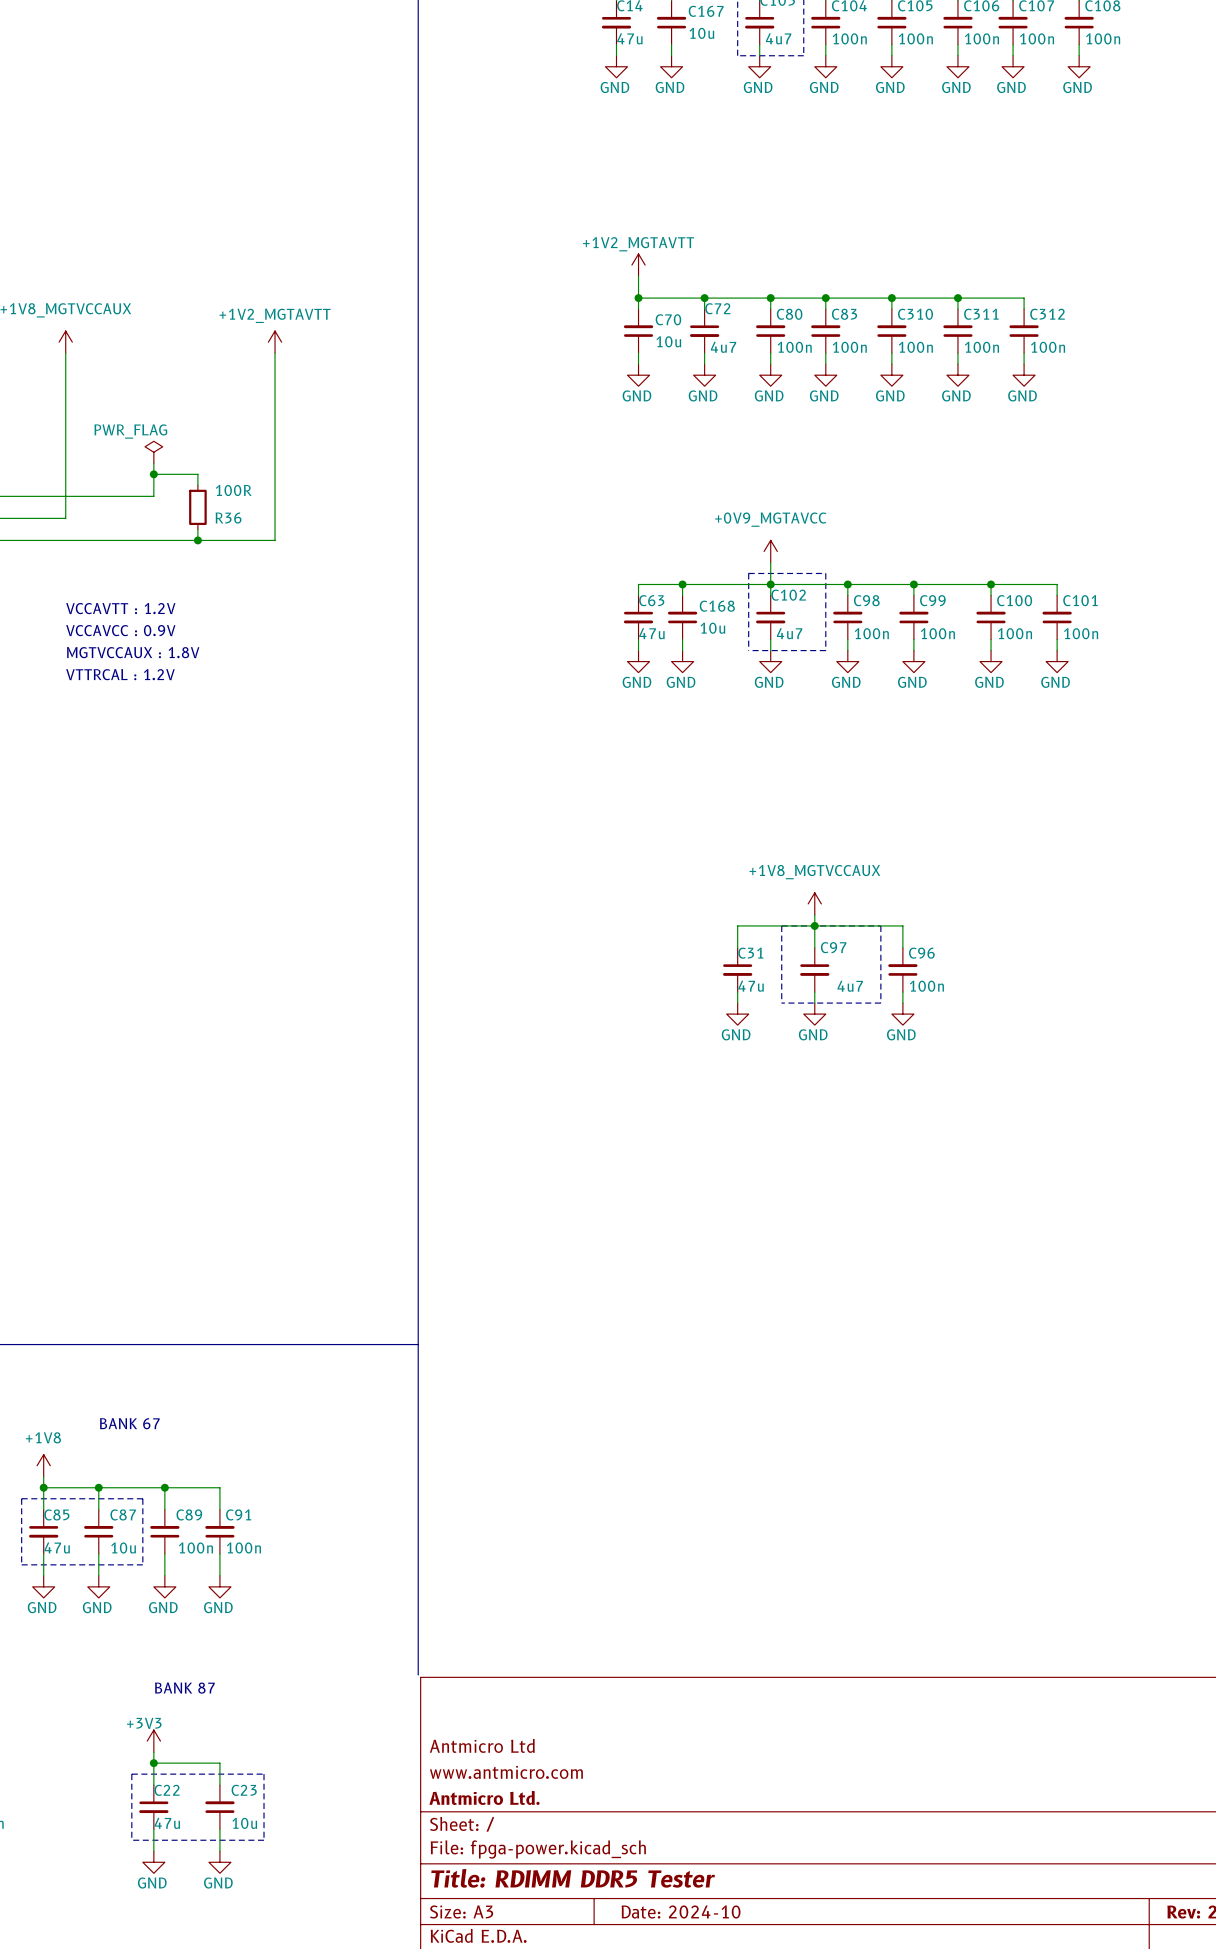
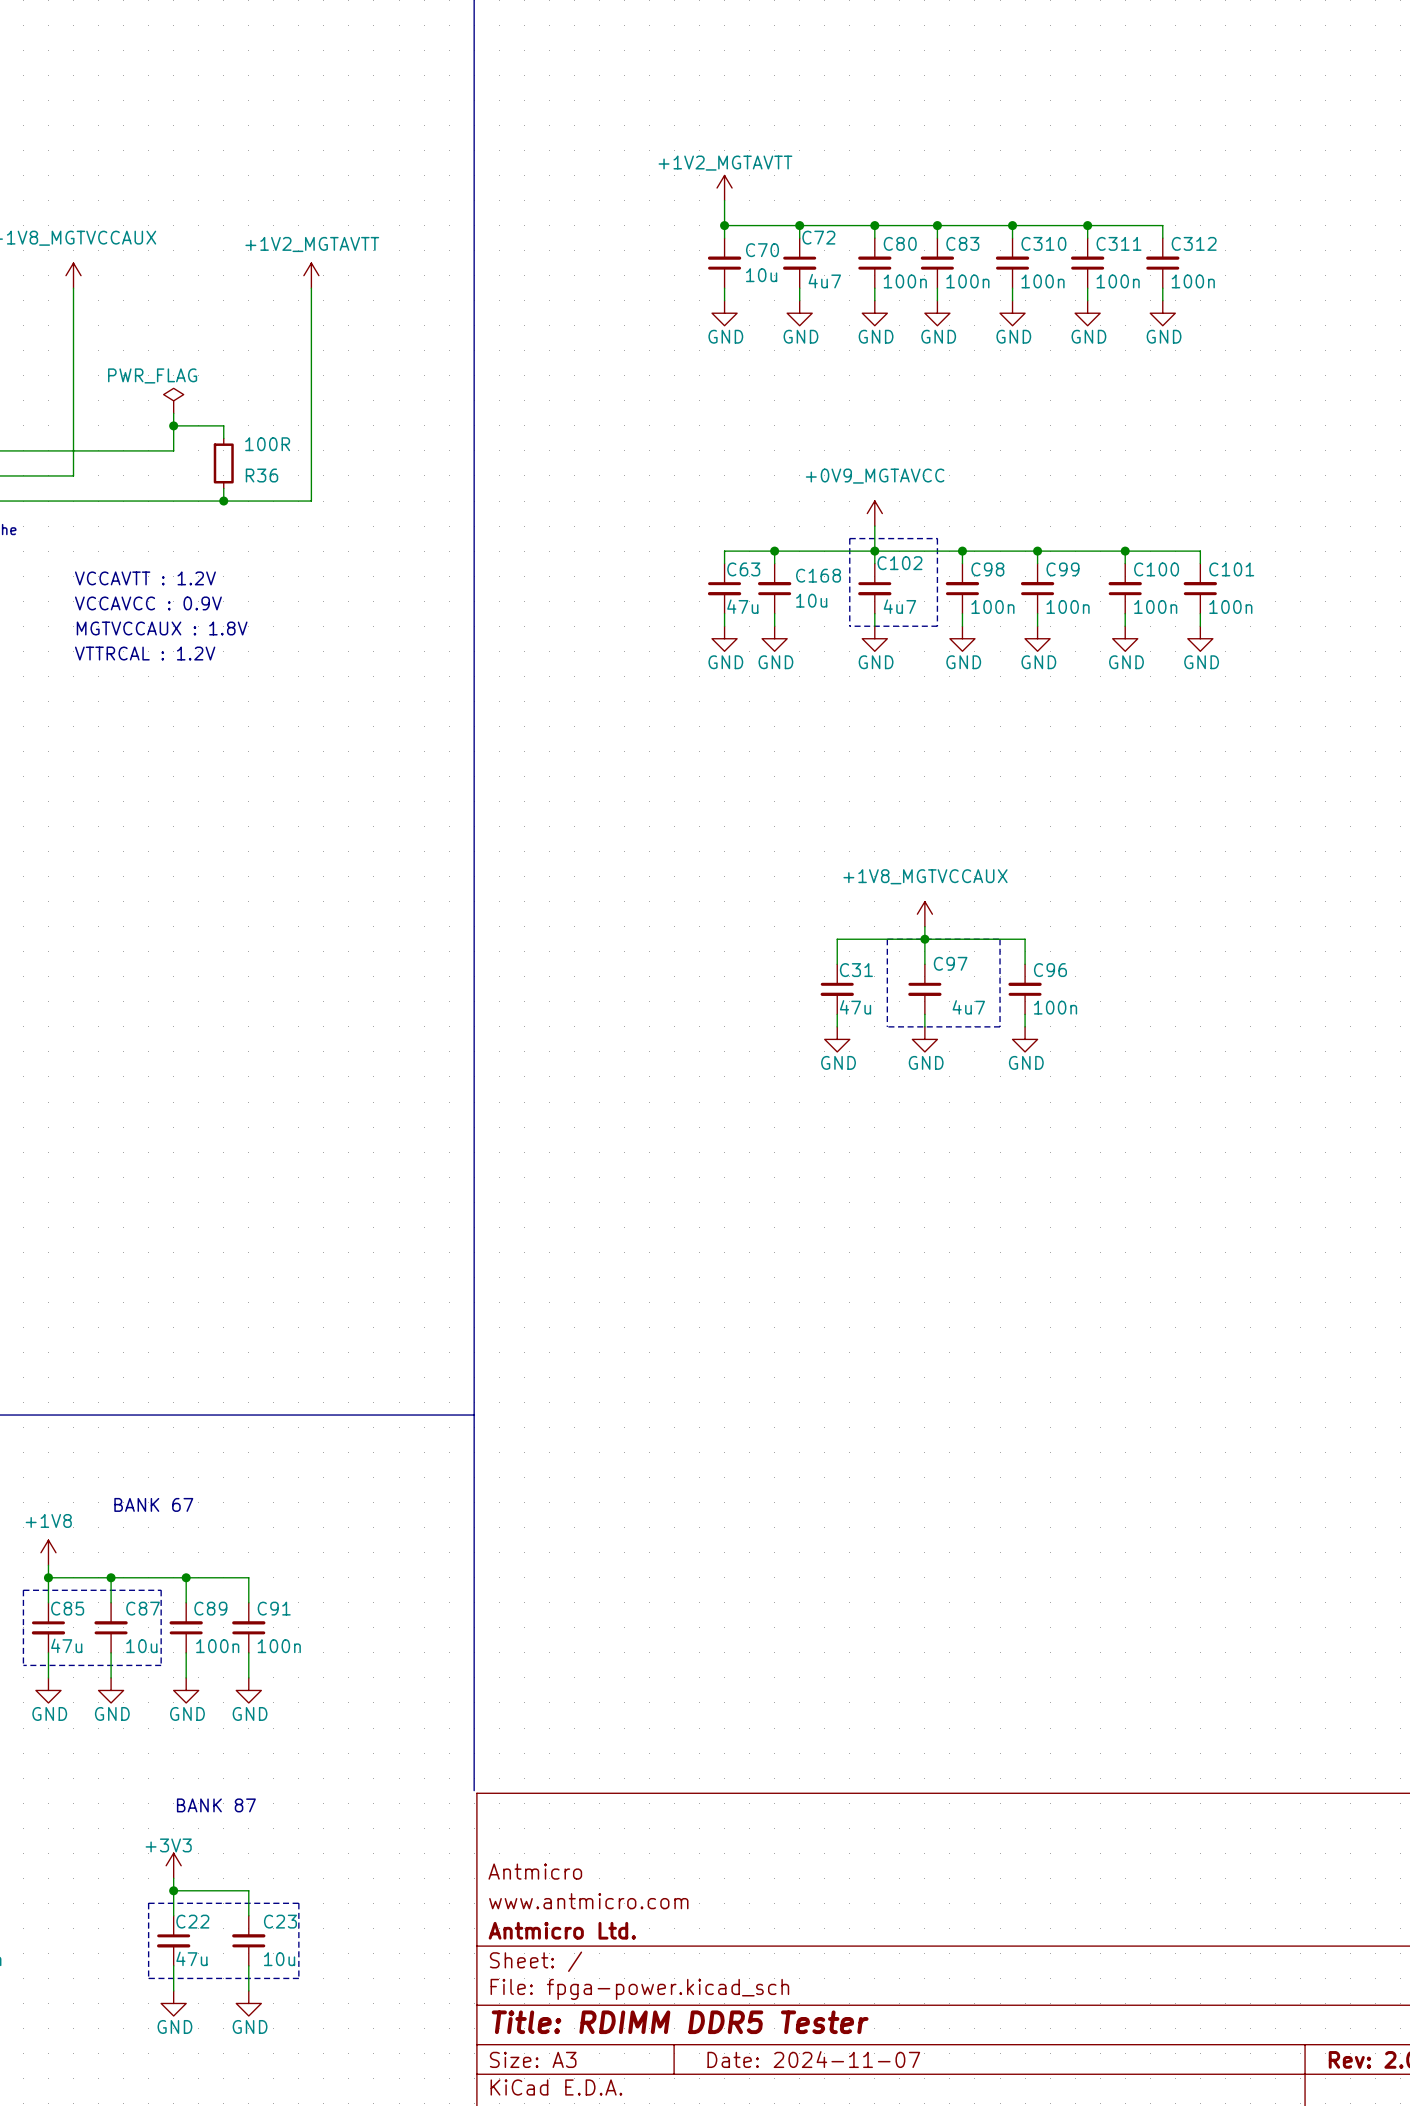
title block: Antmicro Ltd (482, 1745) -> Antmicro (535, 1871)
title block: Date: 2024-10 (681, 1911) -> Date: 2024-11-07 (813, 2059)

